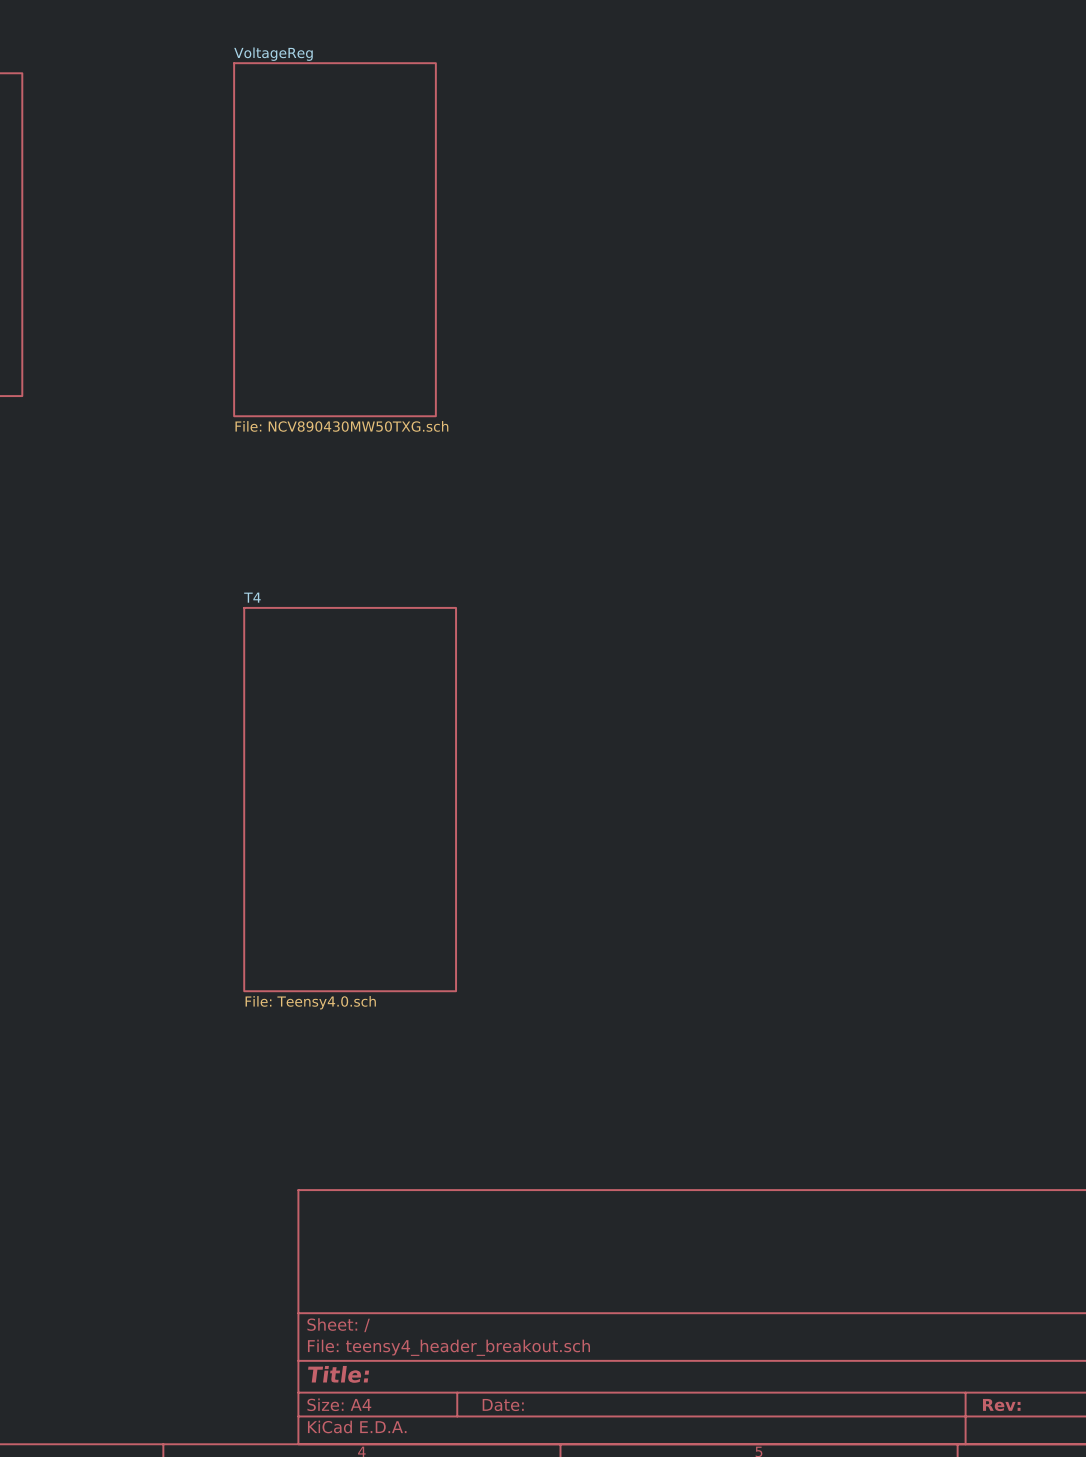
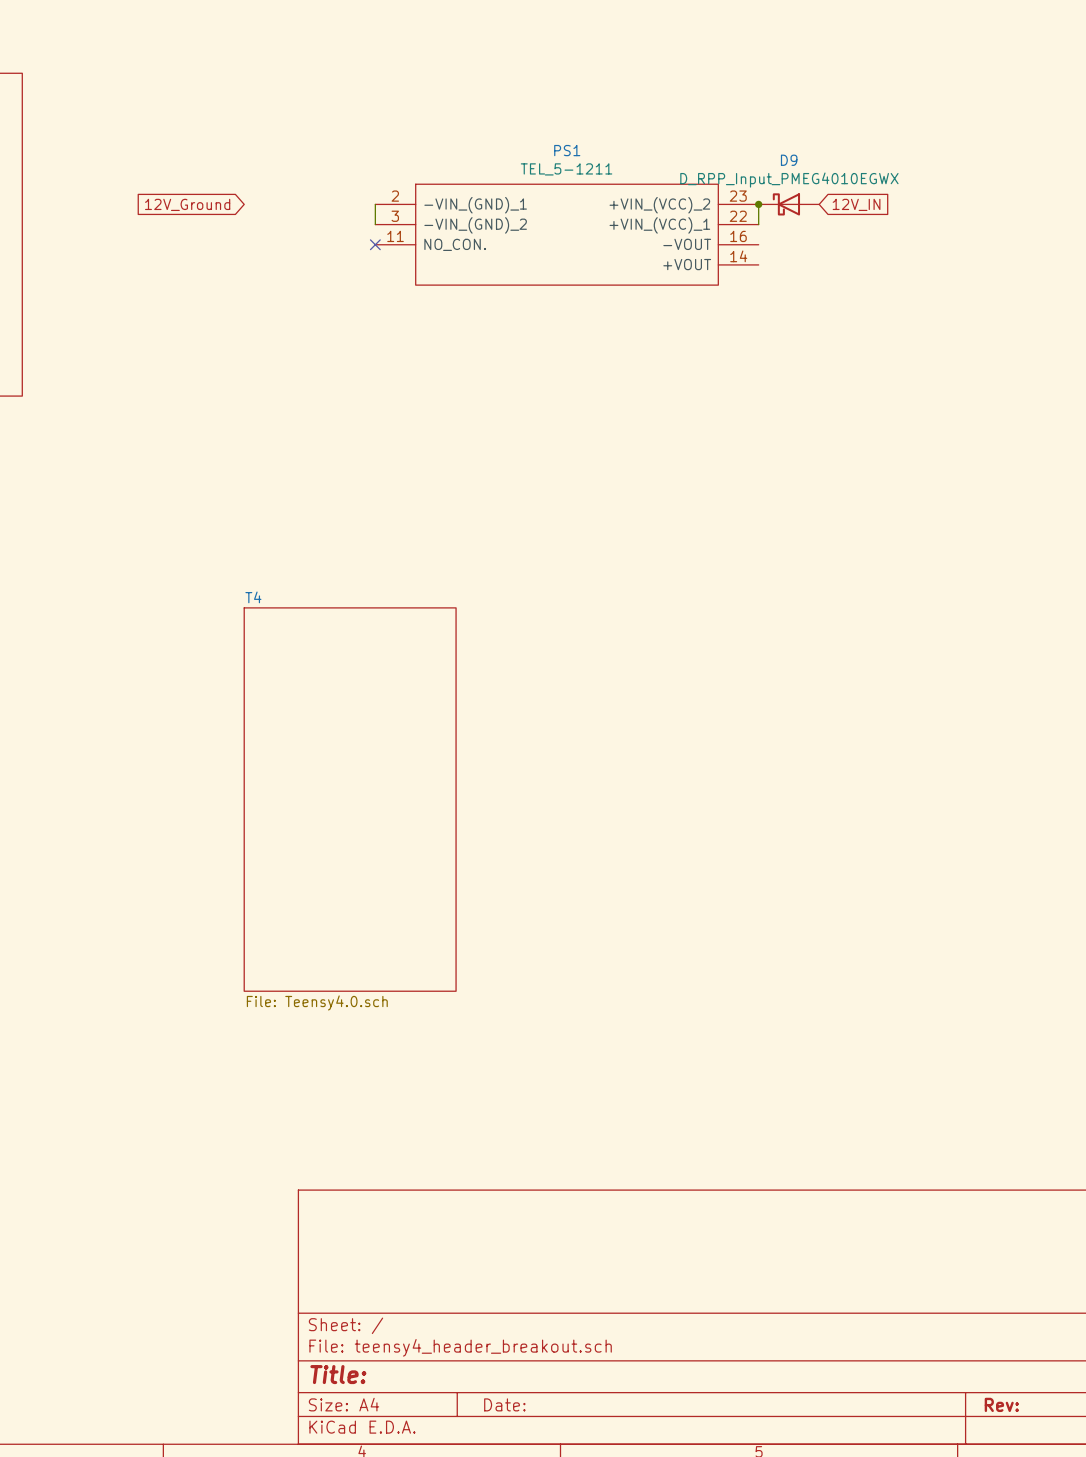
wire: none -> (375, 204) (375, 224)
wire: none -> (758, 204) (758, 224)
junction: none -> (758, 204)
D9: none -> D_RPP_Input_PMEG4010EGWX (788, 204)
global label: none -> 12V_Ground (187, 204)
global label: none -> 12V_IN (856, 204)
PS1: none -> TEL_5-1211 (567, 234)
sheet VoltageReg: File: NCV890430MW50TXG.sch (335, 239) -> none
no-connect mark: none -> (375, 244)

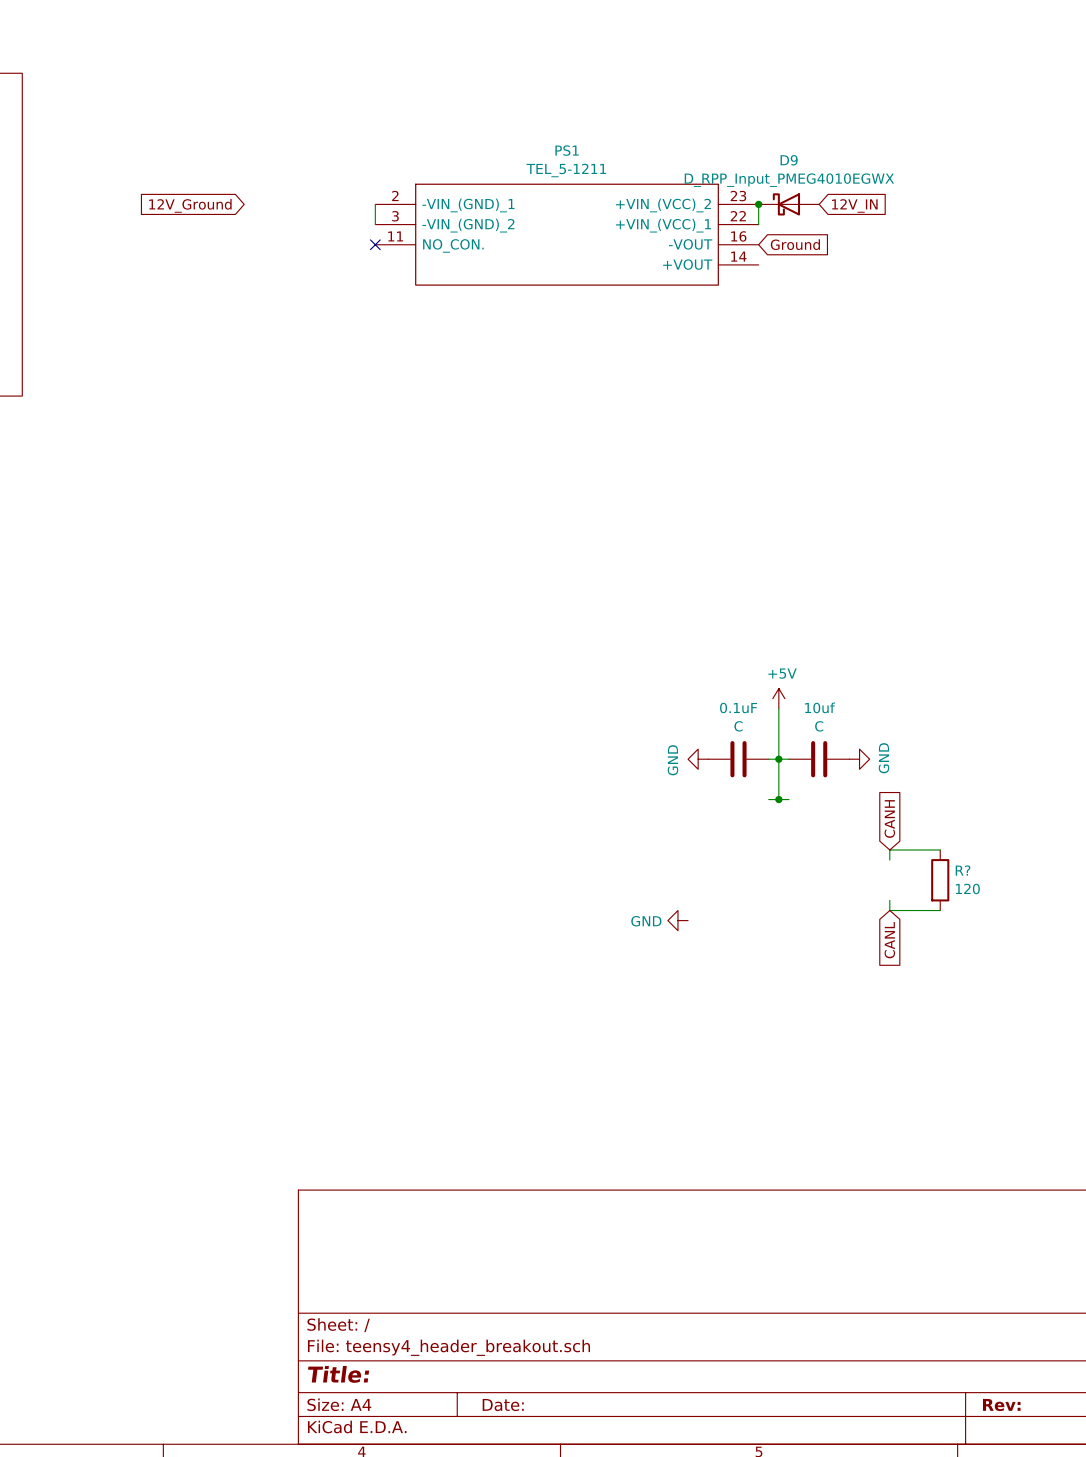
global label: none -> Ground (795, 244)
power symbol: none -> +5V (778, 698)
wire: none -> (778, 708) (778, 799)
power symbol: none -> GND (698, 759)
0.1uF: none -> C (738, 759)
wire: none -> (768, 759) (788, 759)
junction: none -> (778, 759)
10uf: none -> C (819, 759)
power symbol: none -> GND (859, 759)
sheet T4: File: Teensy4.0.sch (350, 799) -> none
wire: none -> (768, 799) (788, 799)
junction: none -> (778, 799)
global label: none -> CANH (889, 819)
wire: none -> (940, 850) (889, 850) (889, 860)
R?: none -> 120 (940, 880)
wire: none -> (889, 900) (889, 910) (940, 910)
power symbol: none -> GND (677, 920)
global label: none -> CANL (889, 940)

